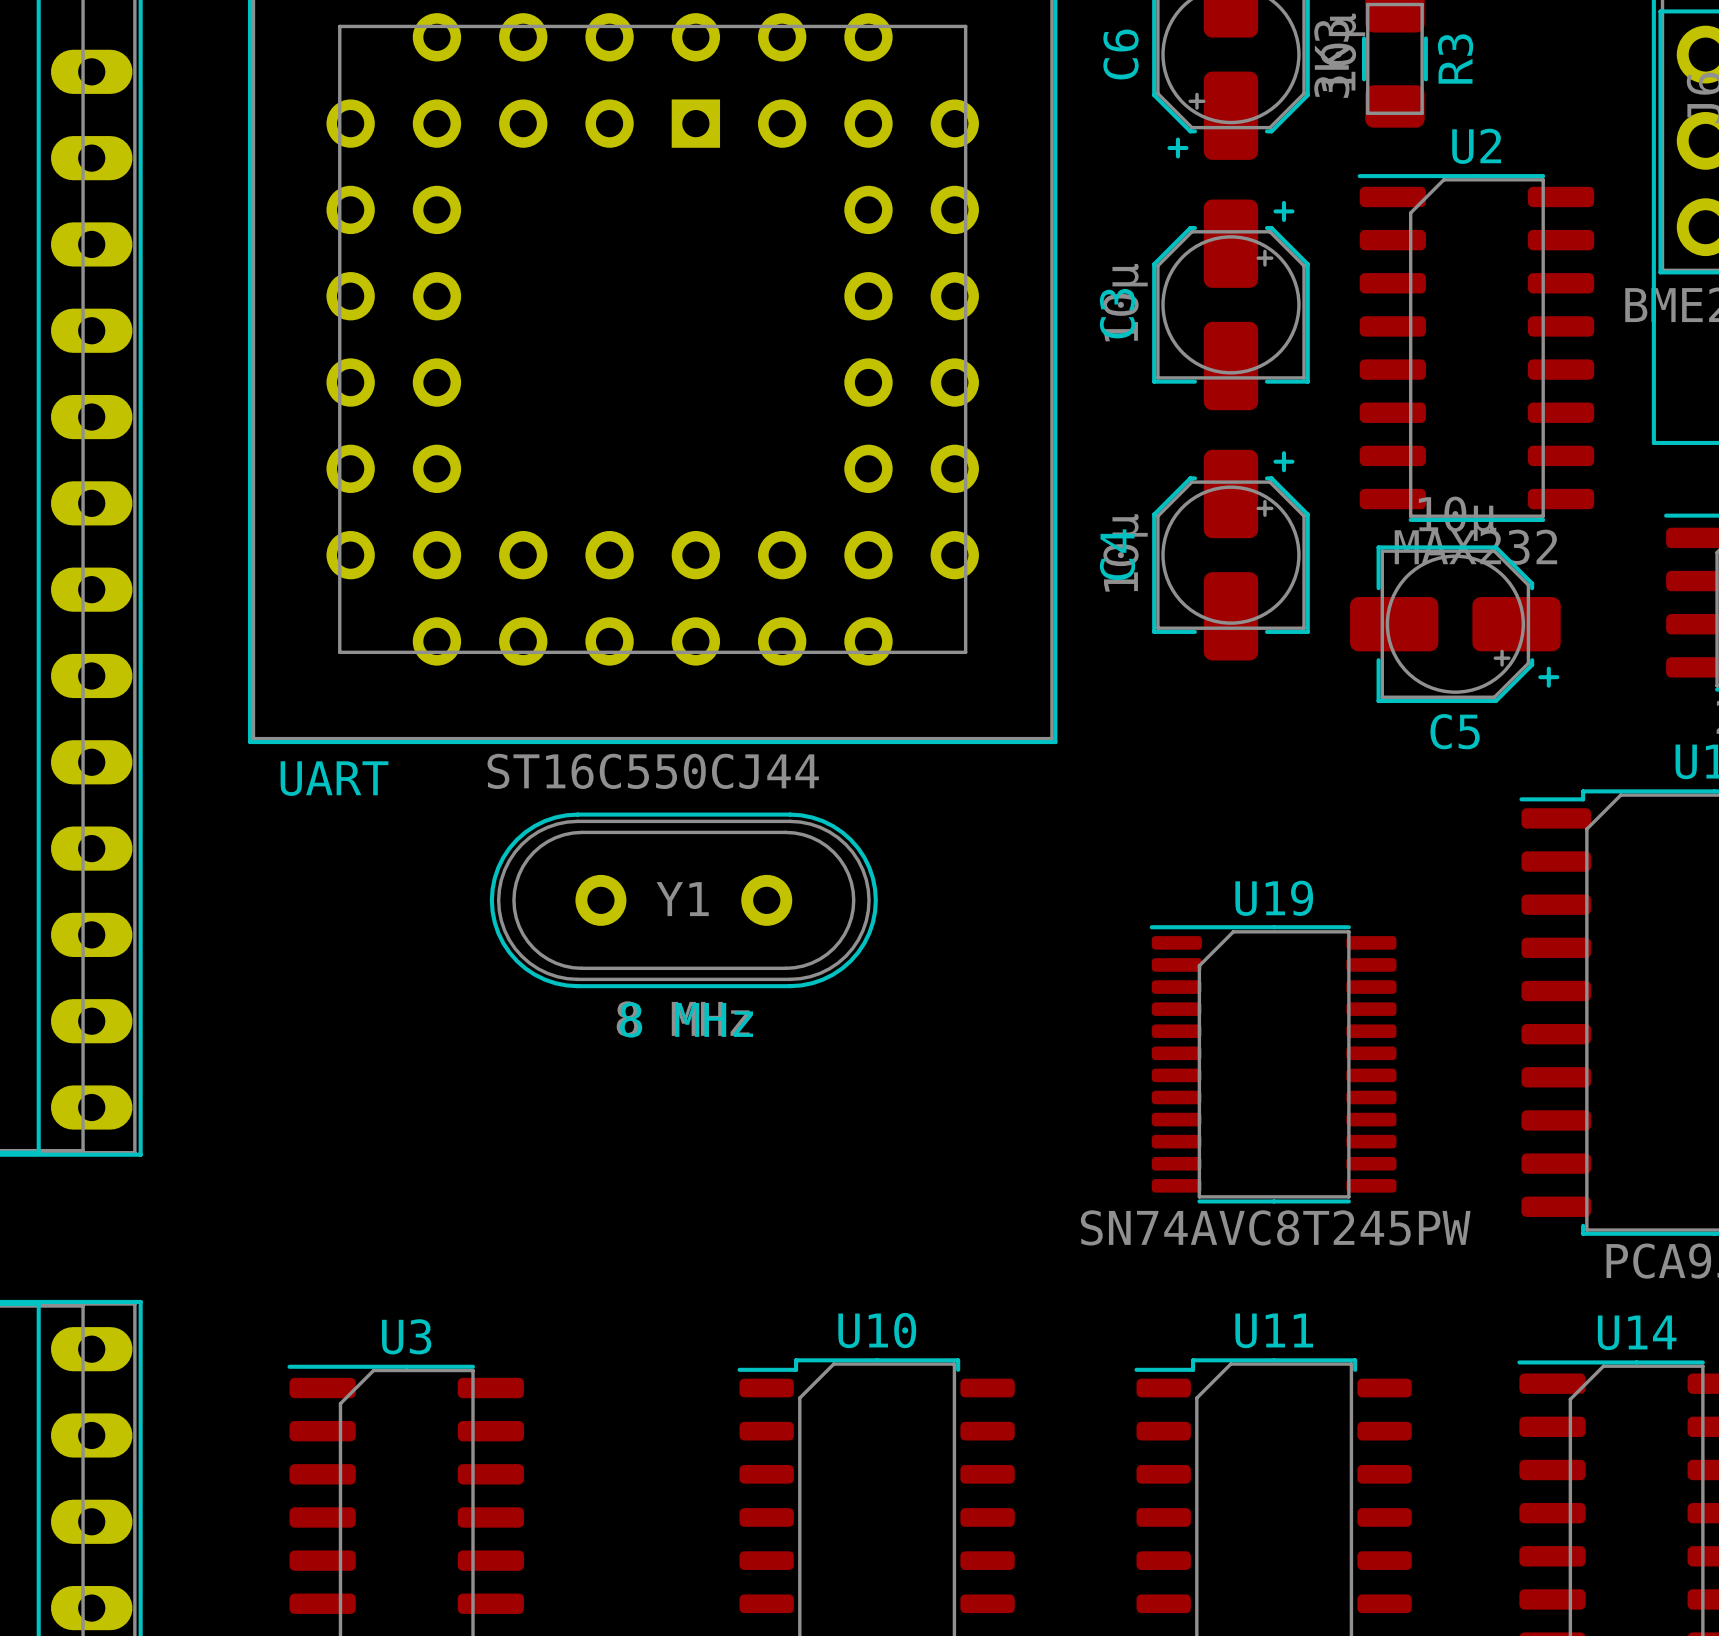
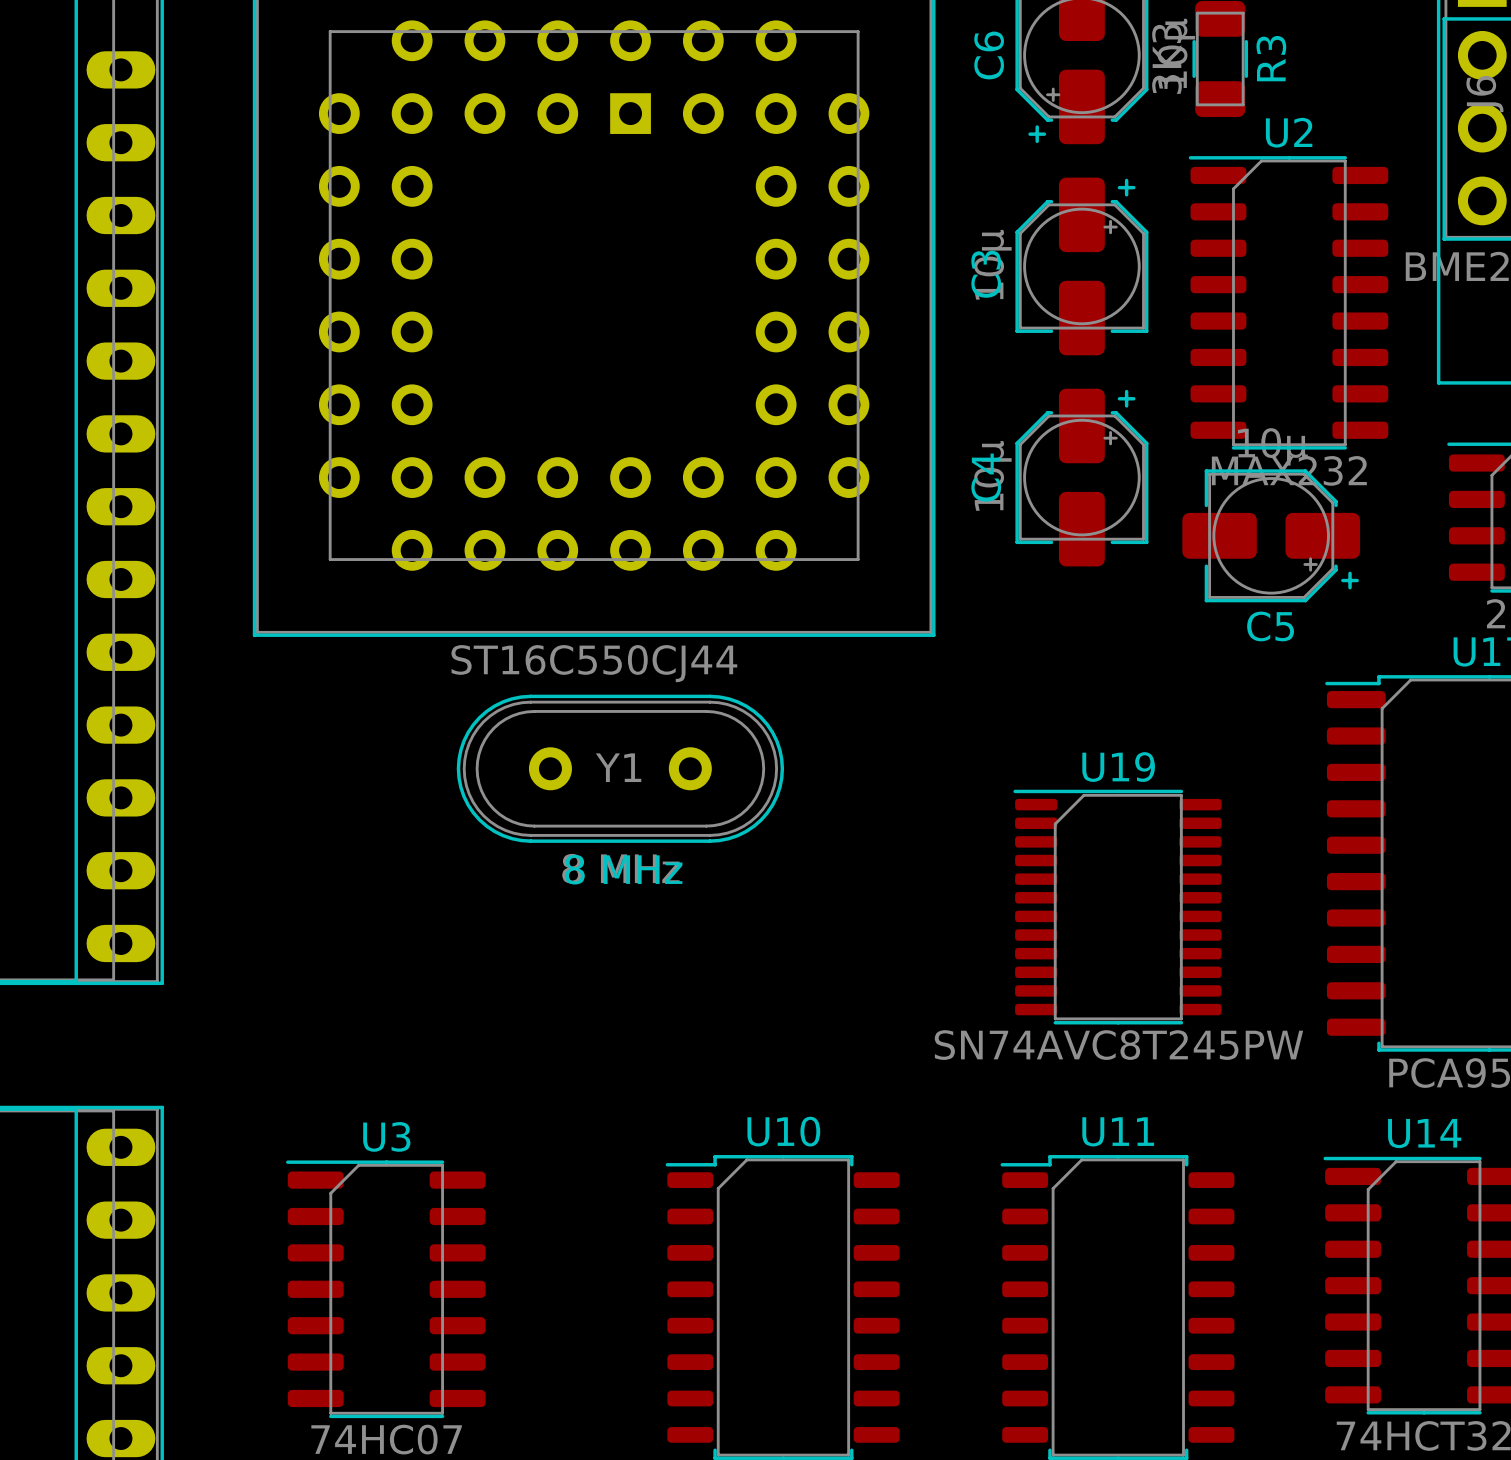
text: UART (334, 778) -> none

